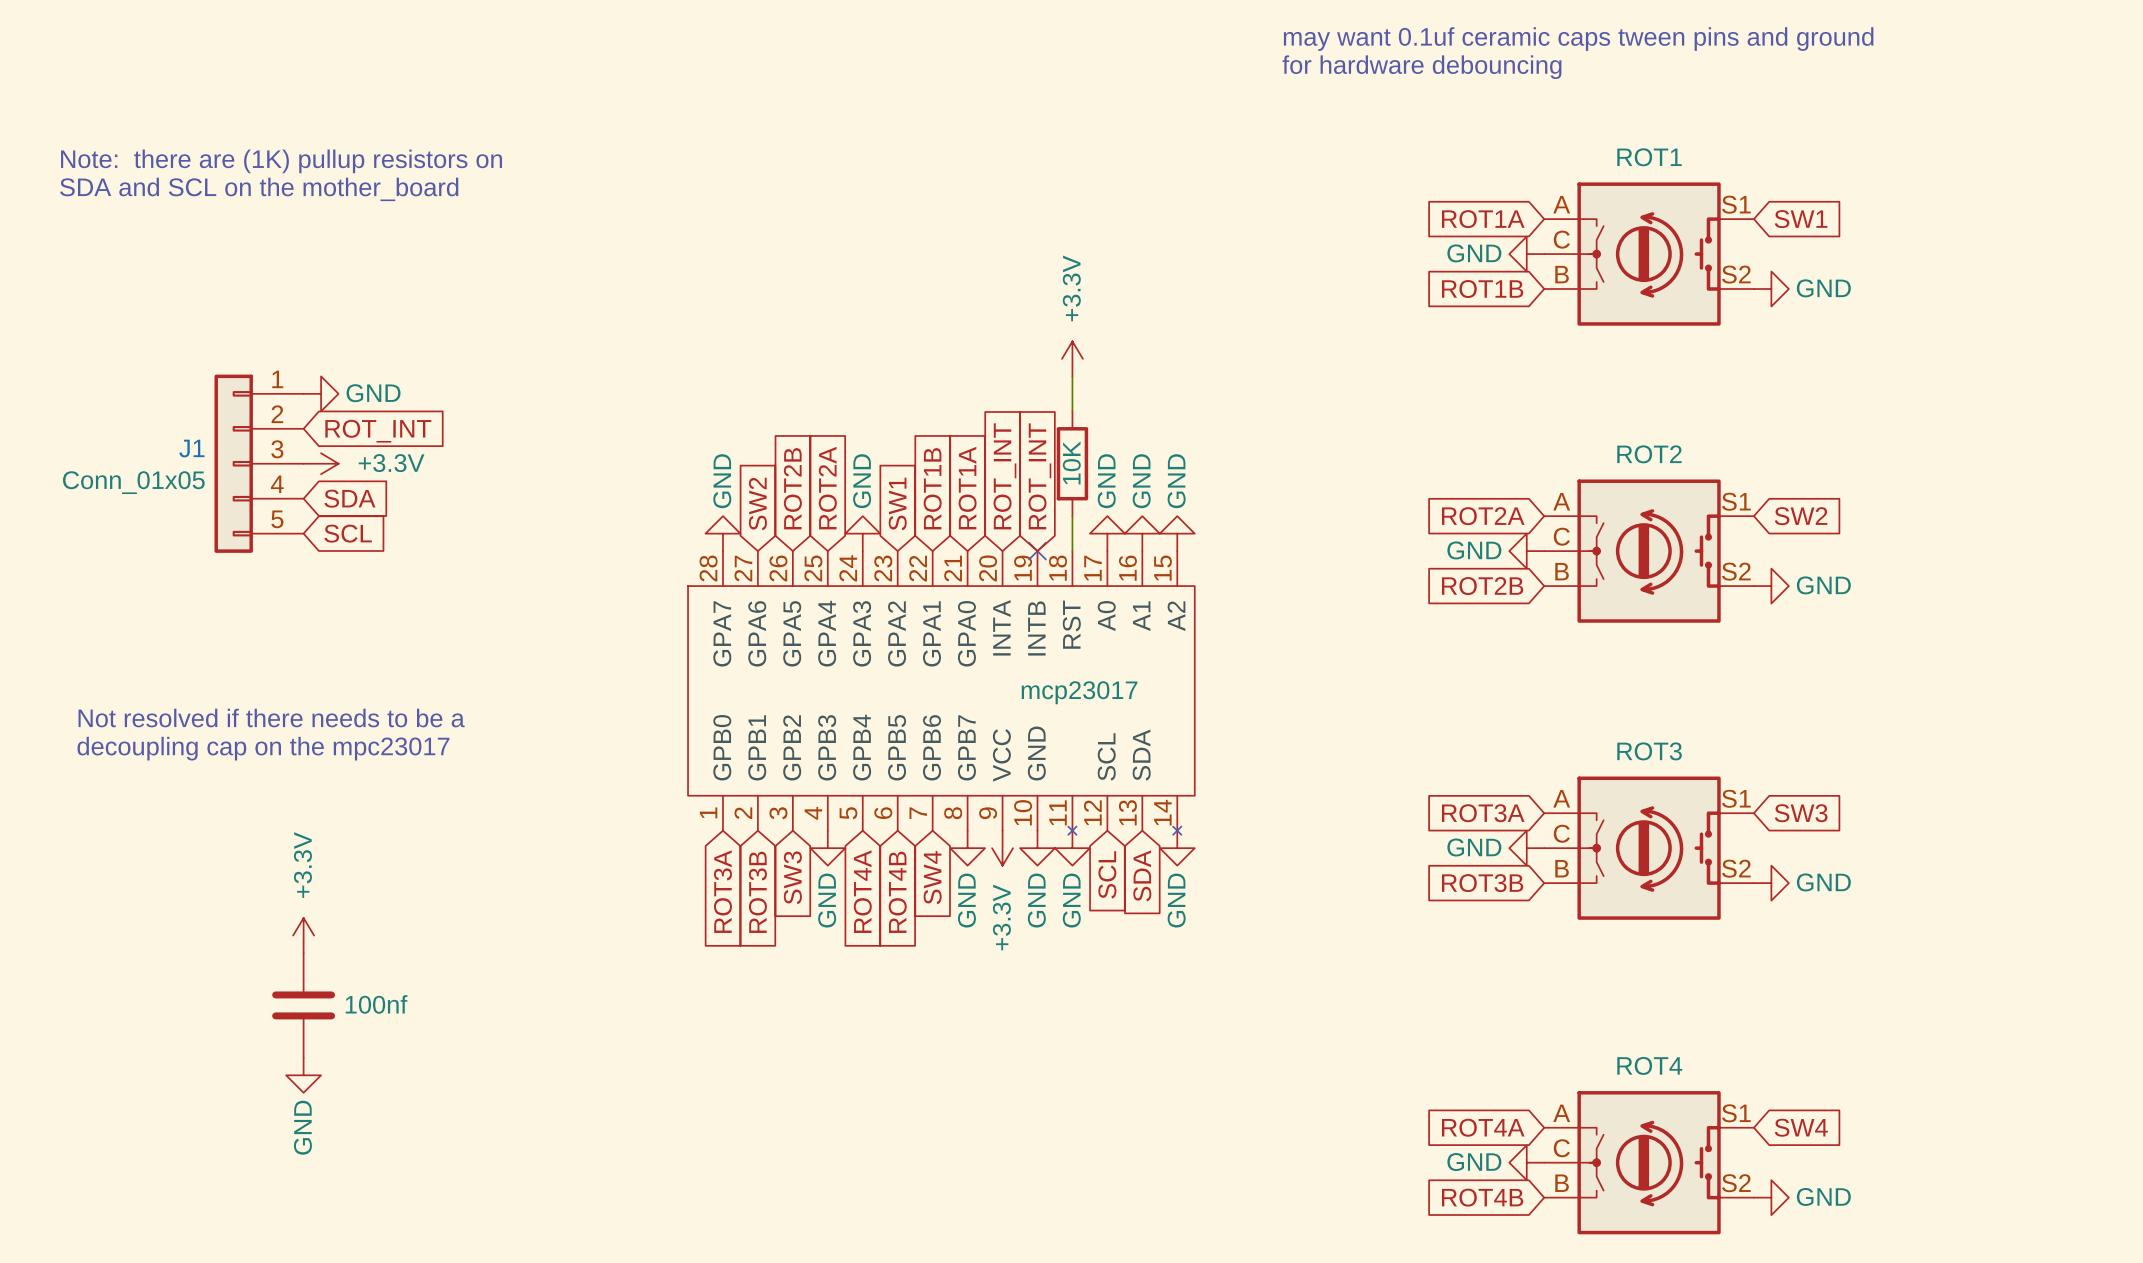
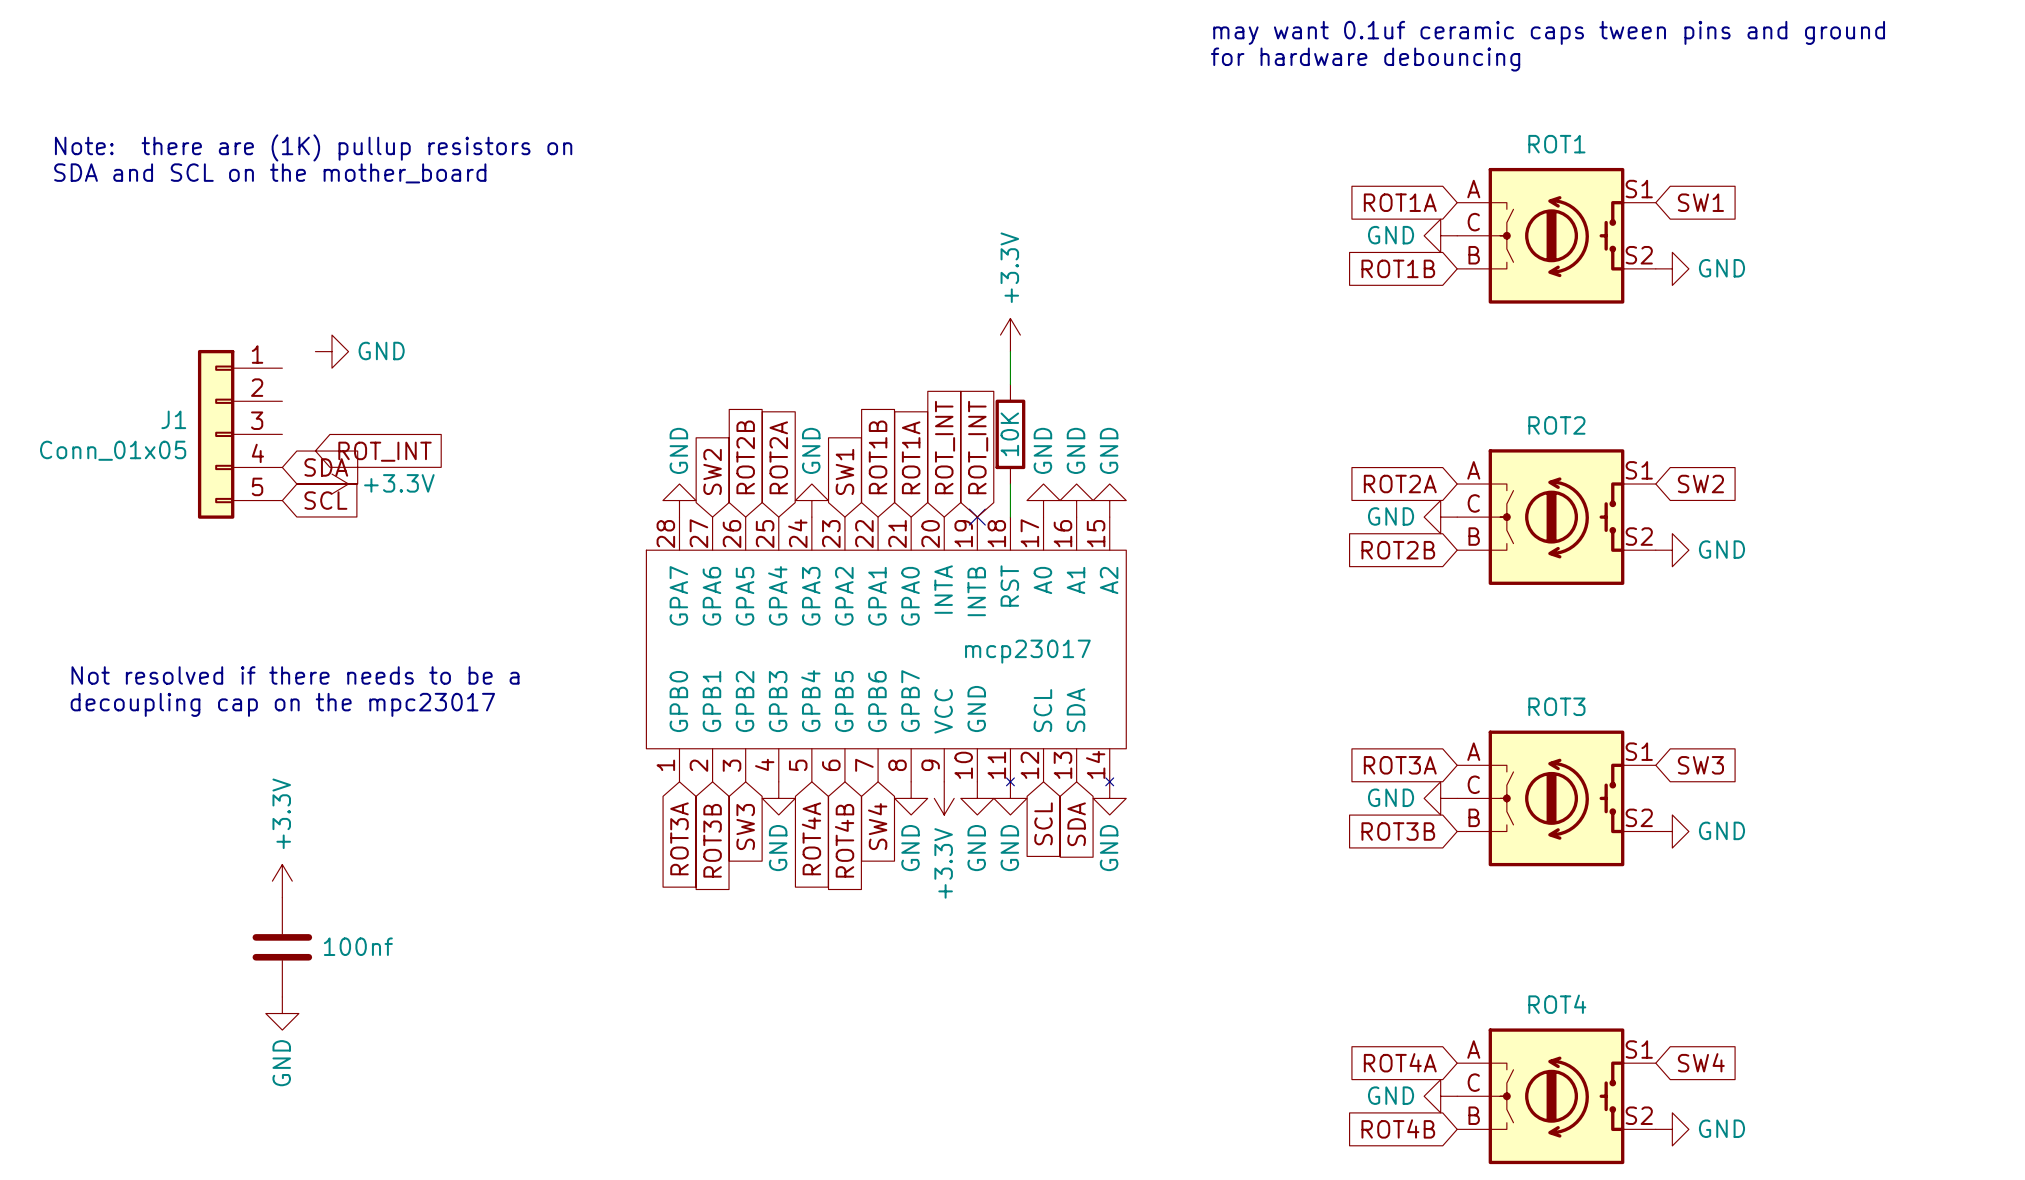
power symbol position: GND (321, 393) -> GND (331, 351)
global label position: ROT_INT (378, 431) -> ROT_INT (385, 451)
power symbol position: +3.3V (321, 463) -> +3.3V (331, 484)

